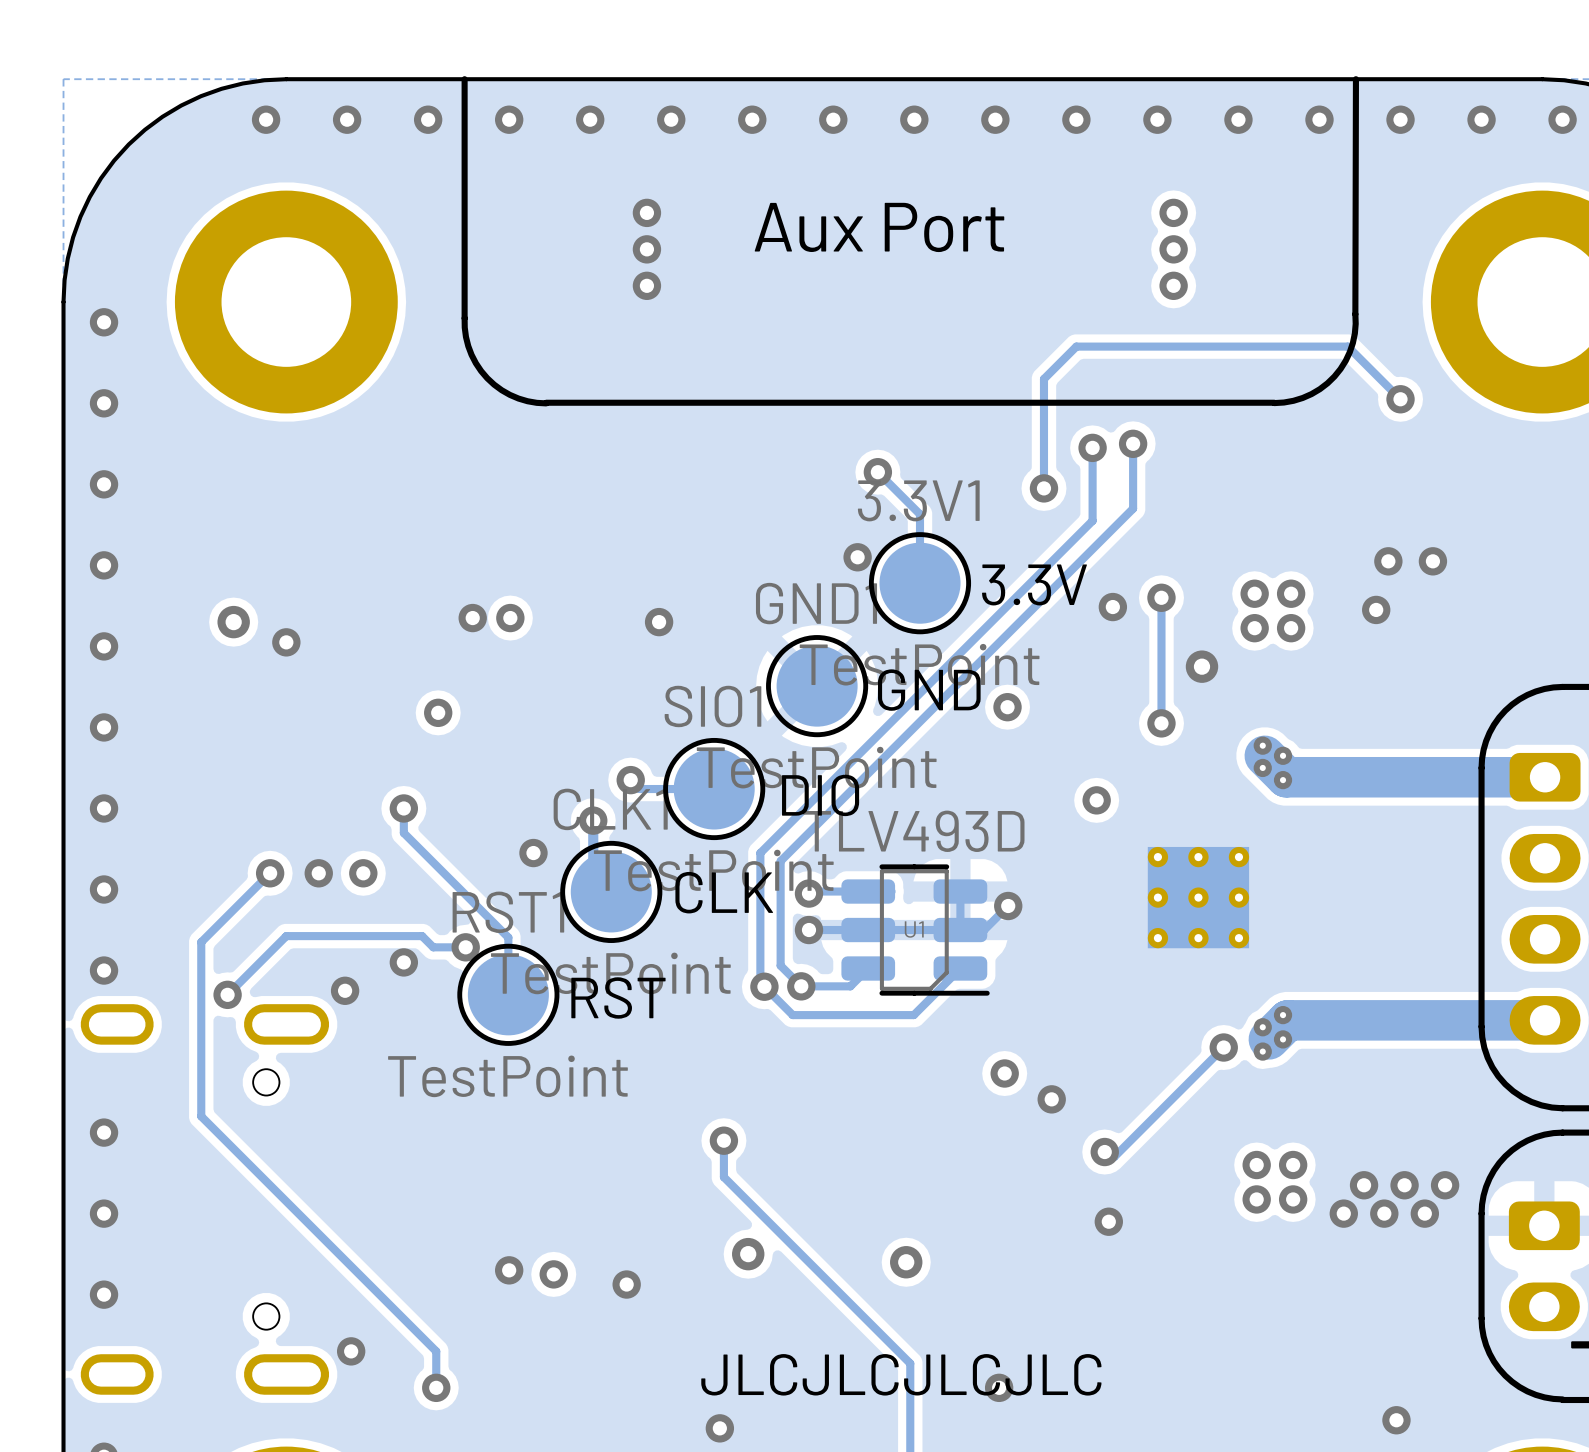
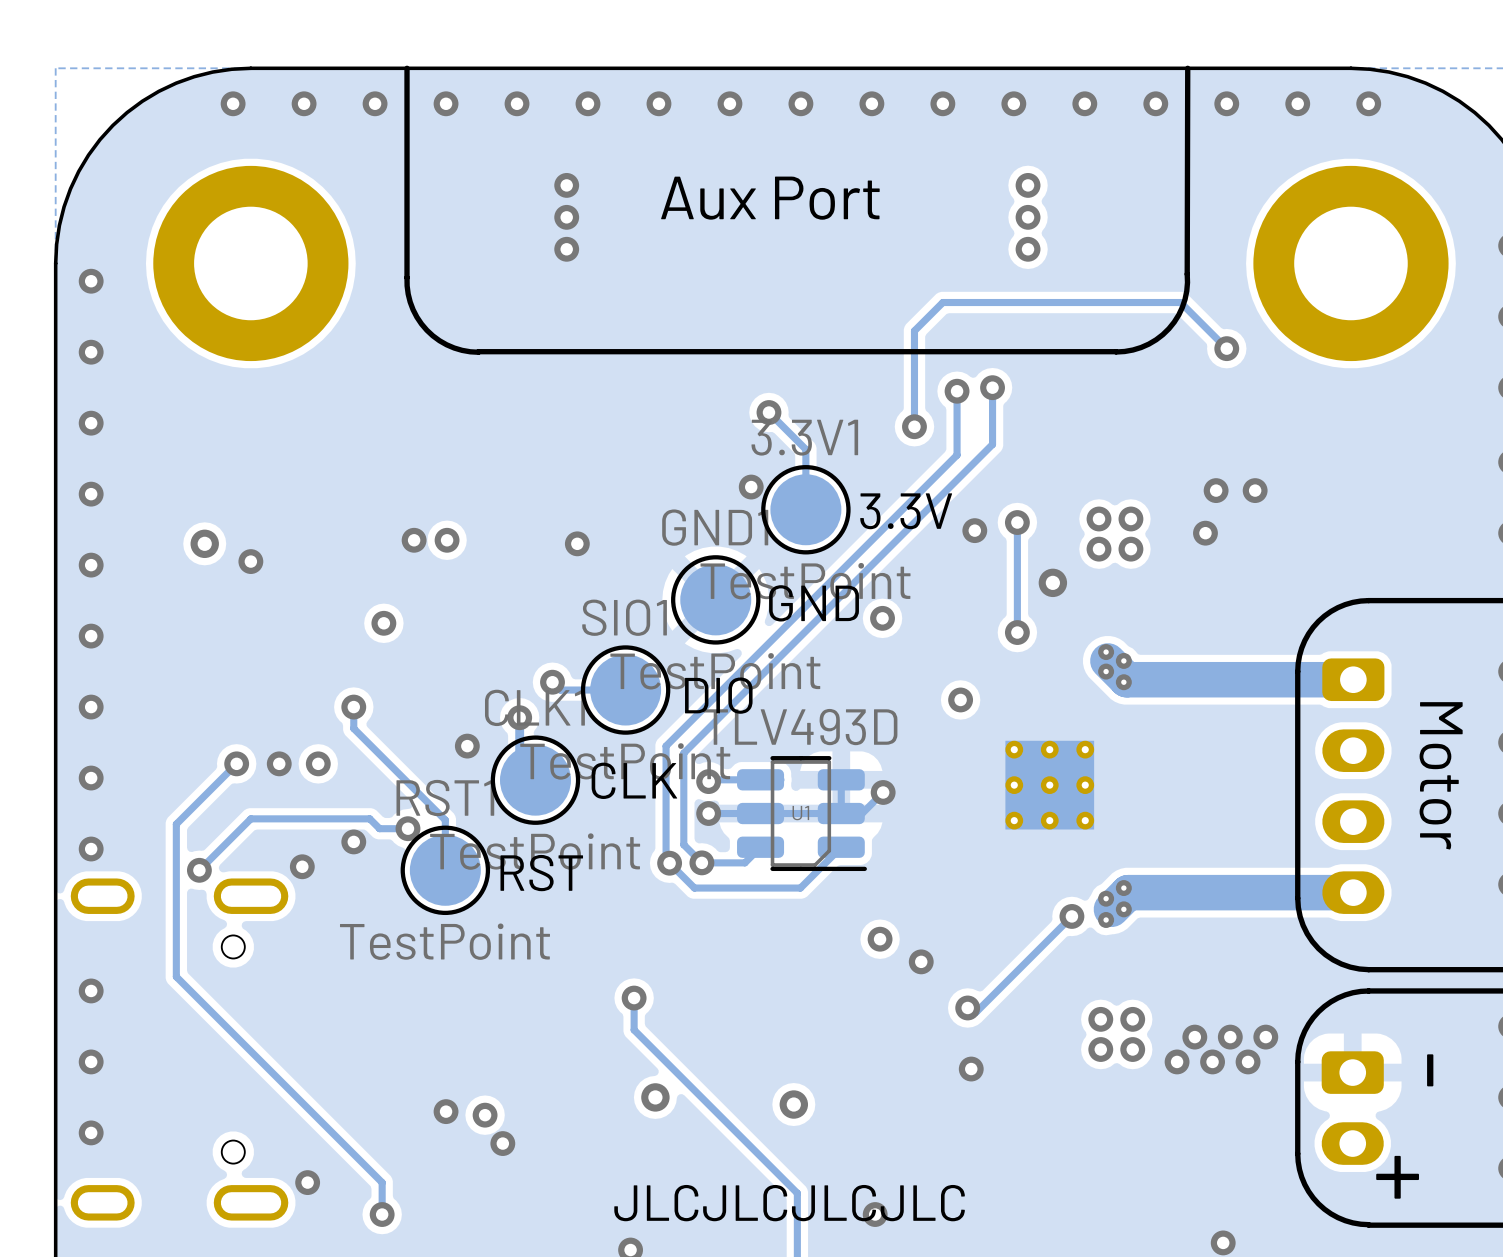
via position: (626, 1284) -> (502, 1143)

